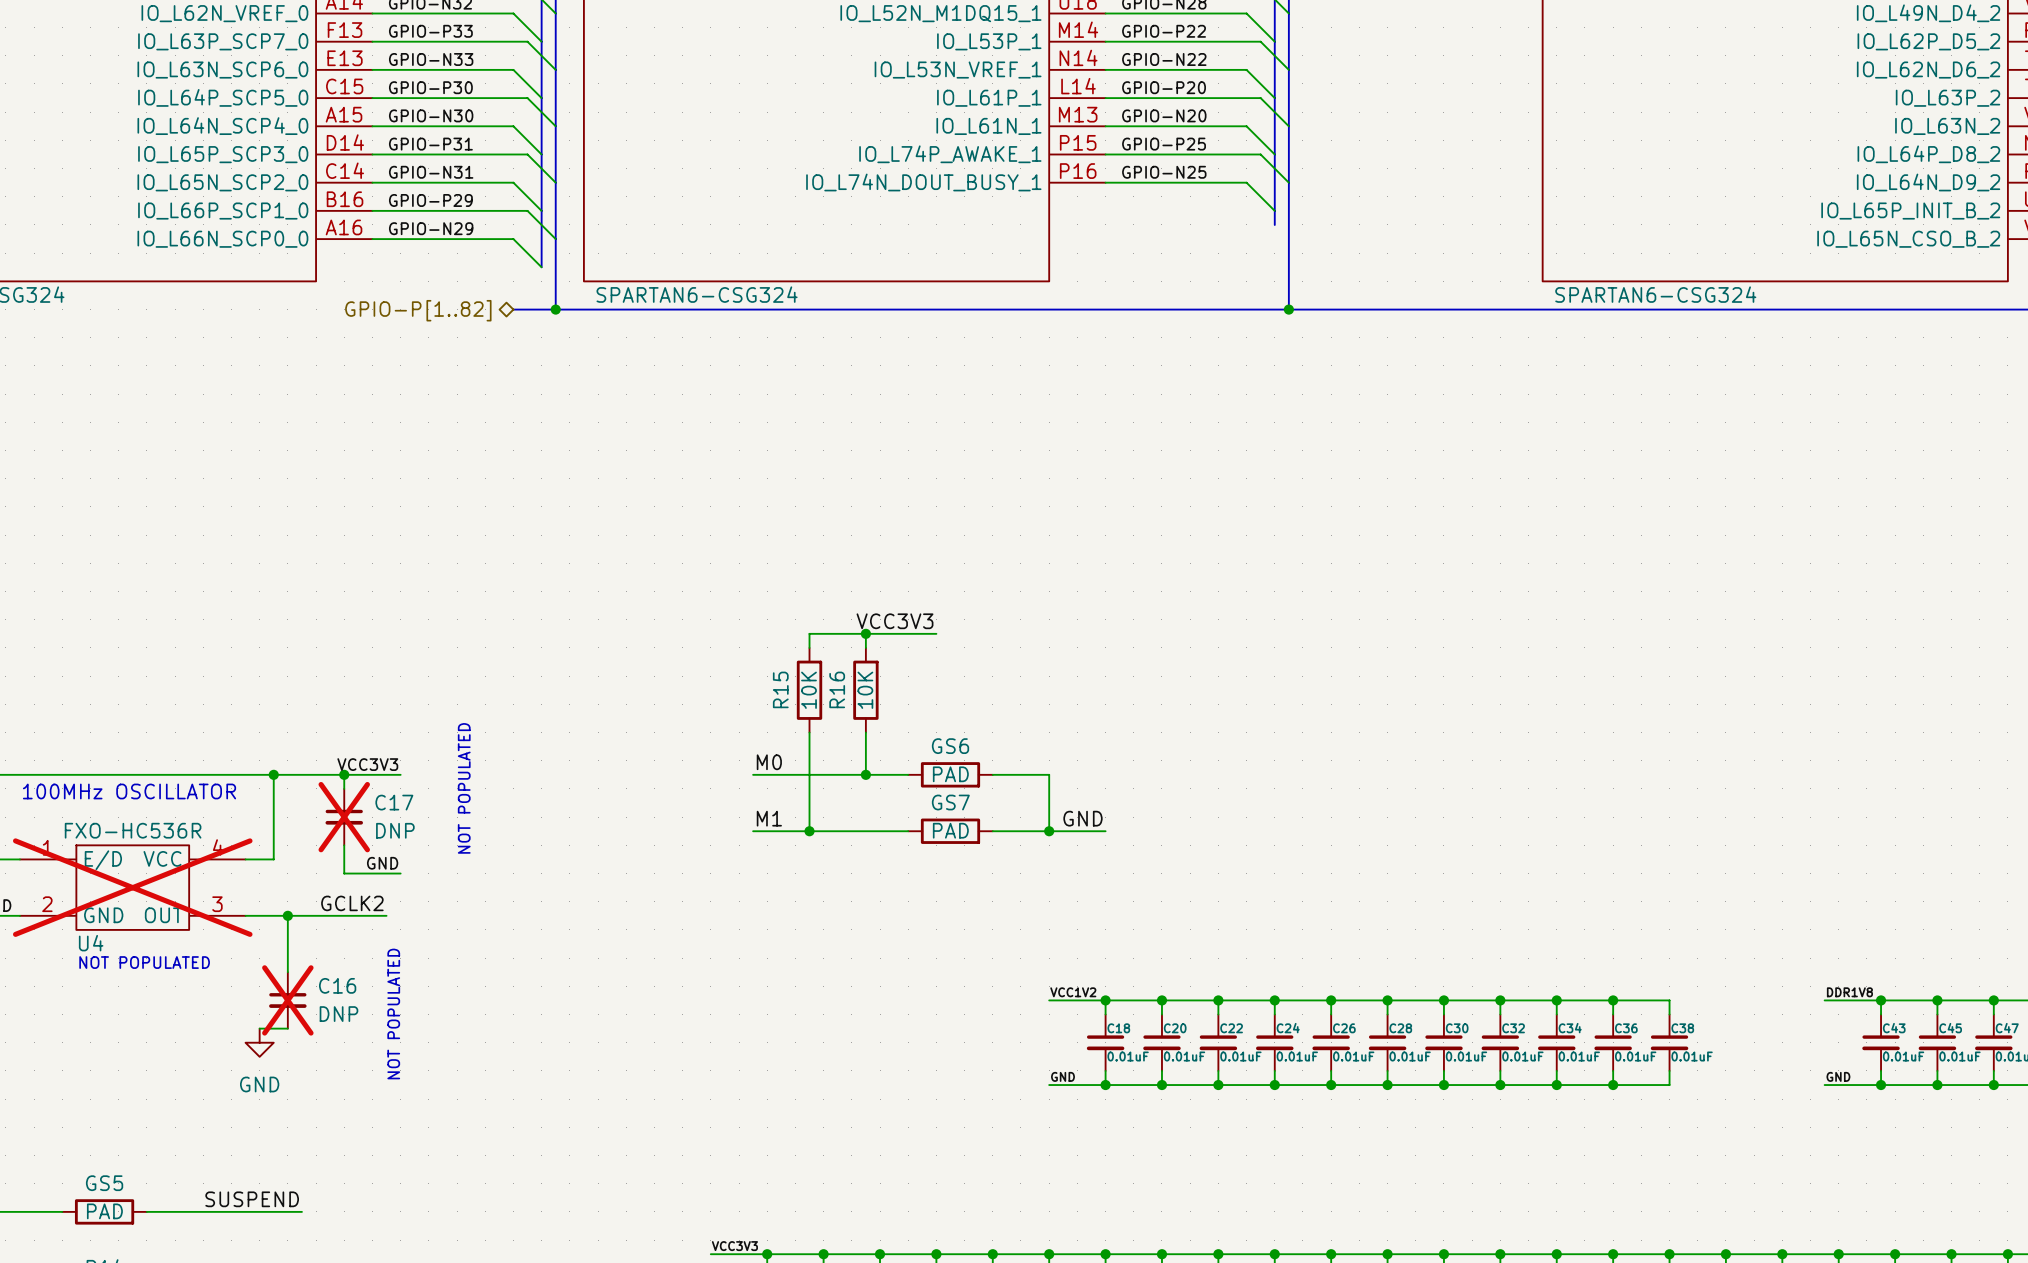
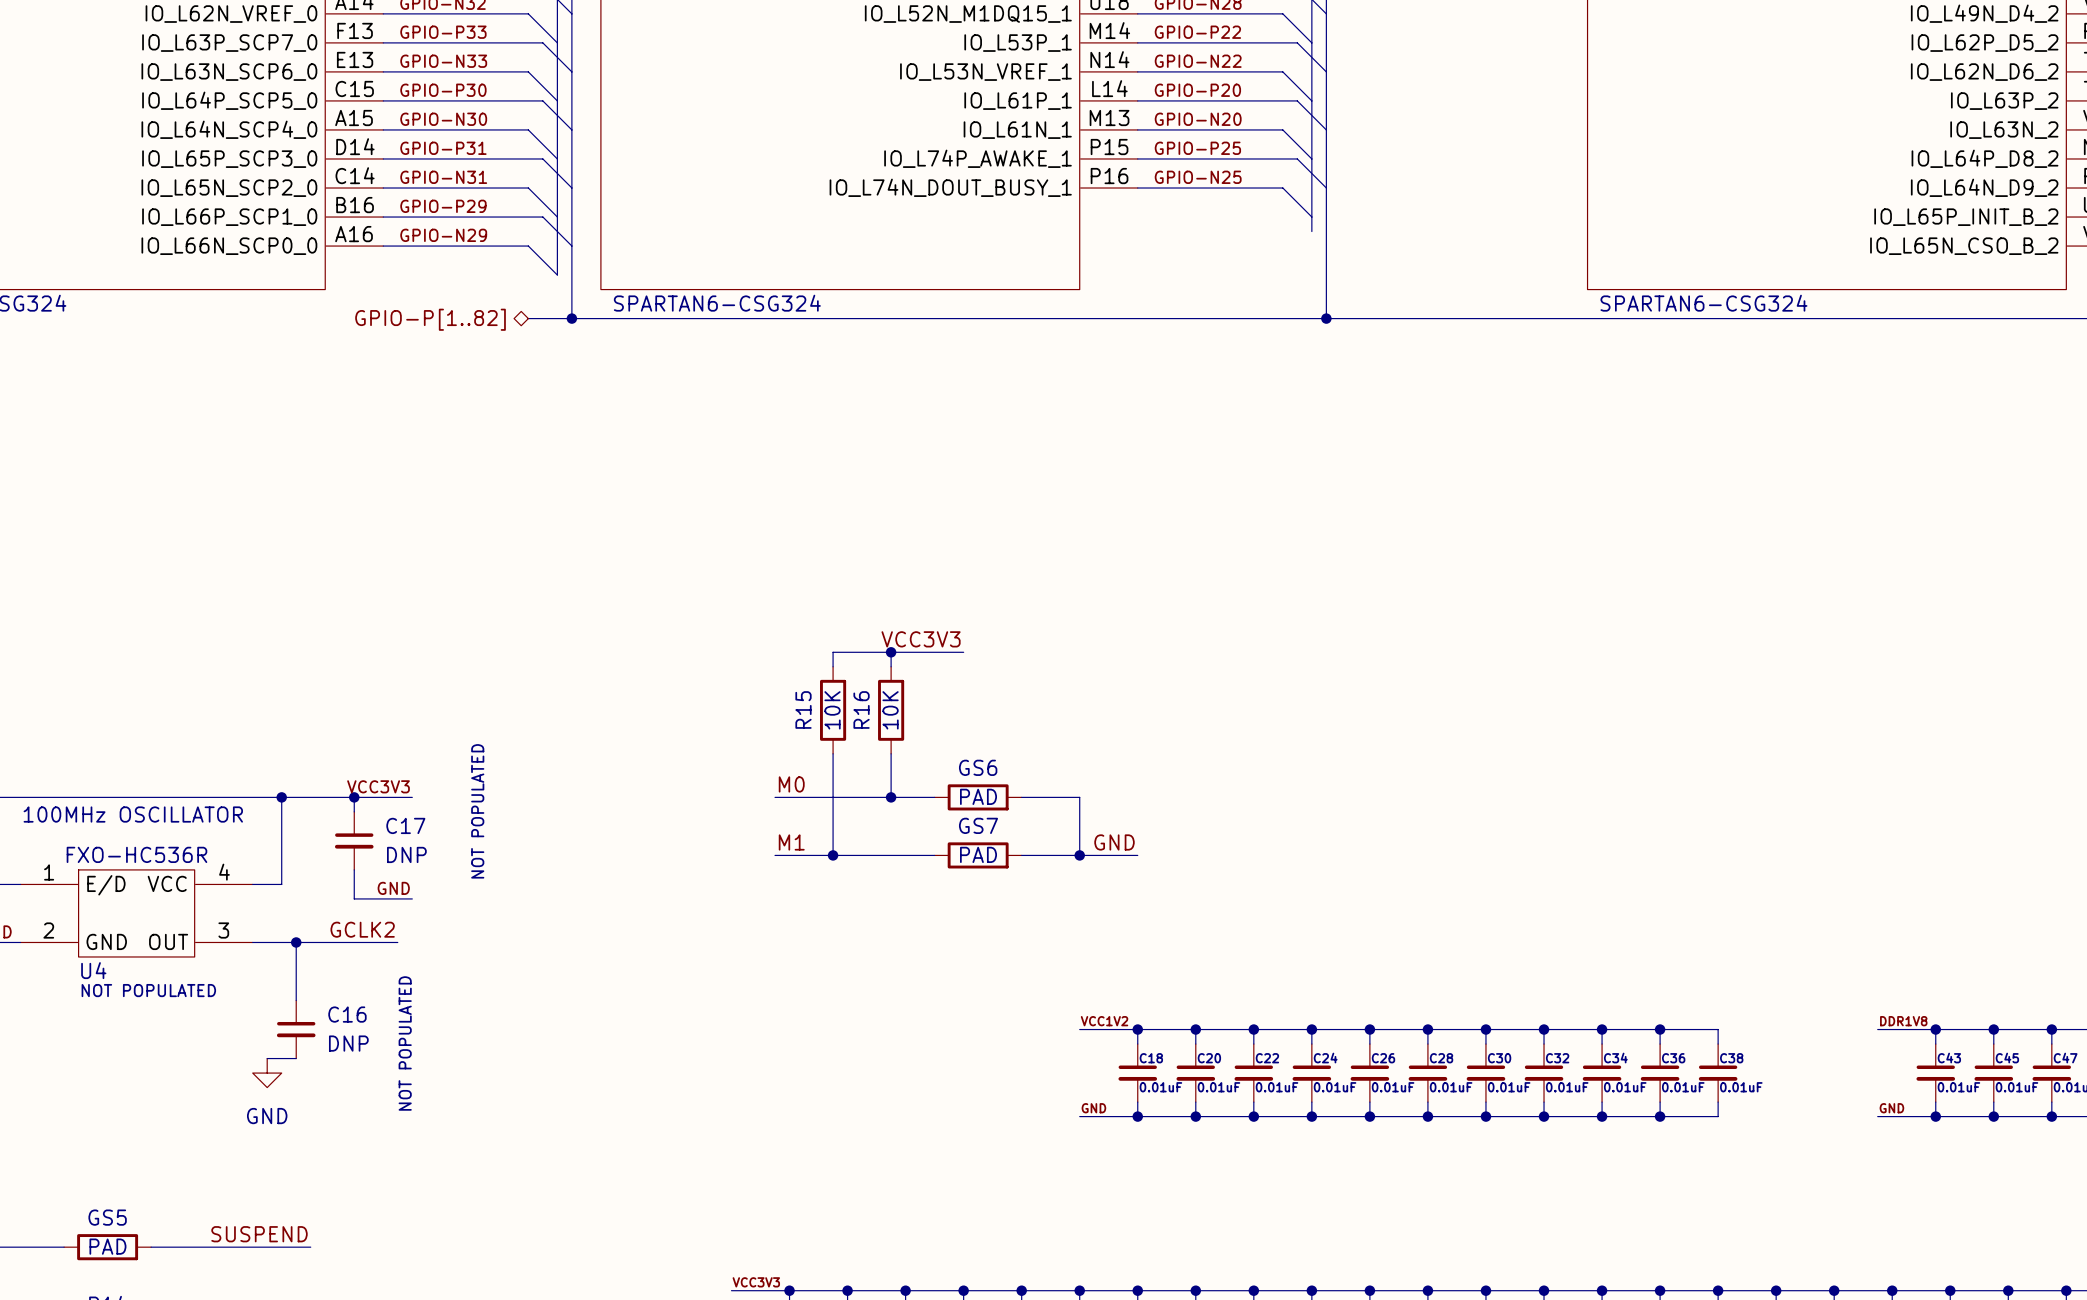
C17 do-not-place cross: (344, 817) -> none
U4 do-not-place cross: (132, 887) -> none
C16 do-not-place cross: (287, 1000) -> none

